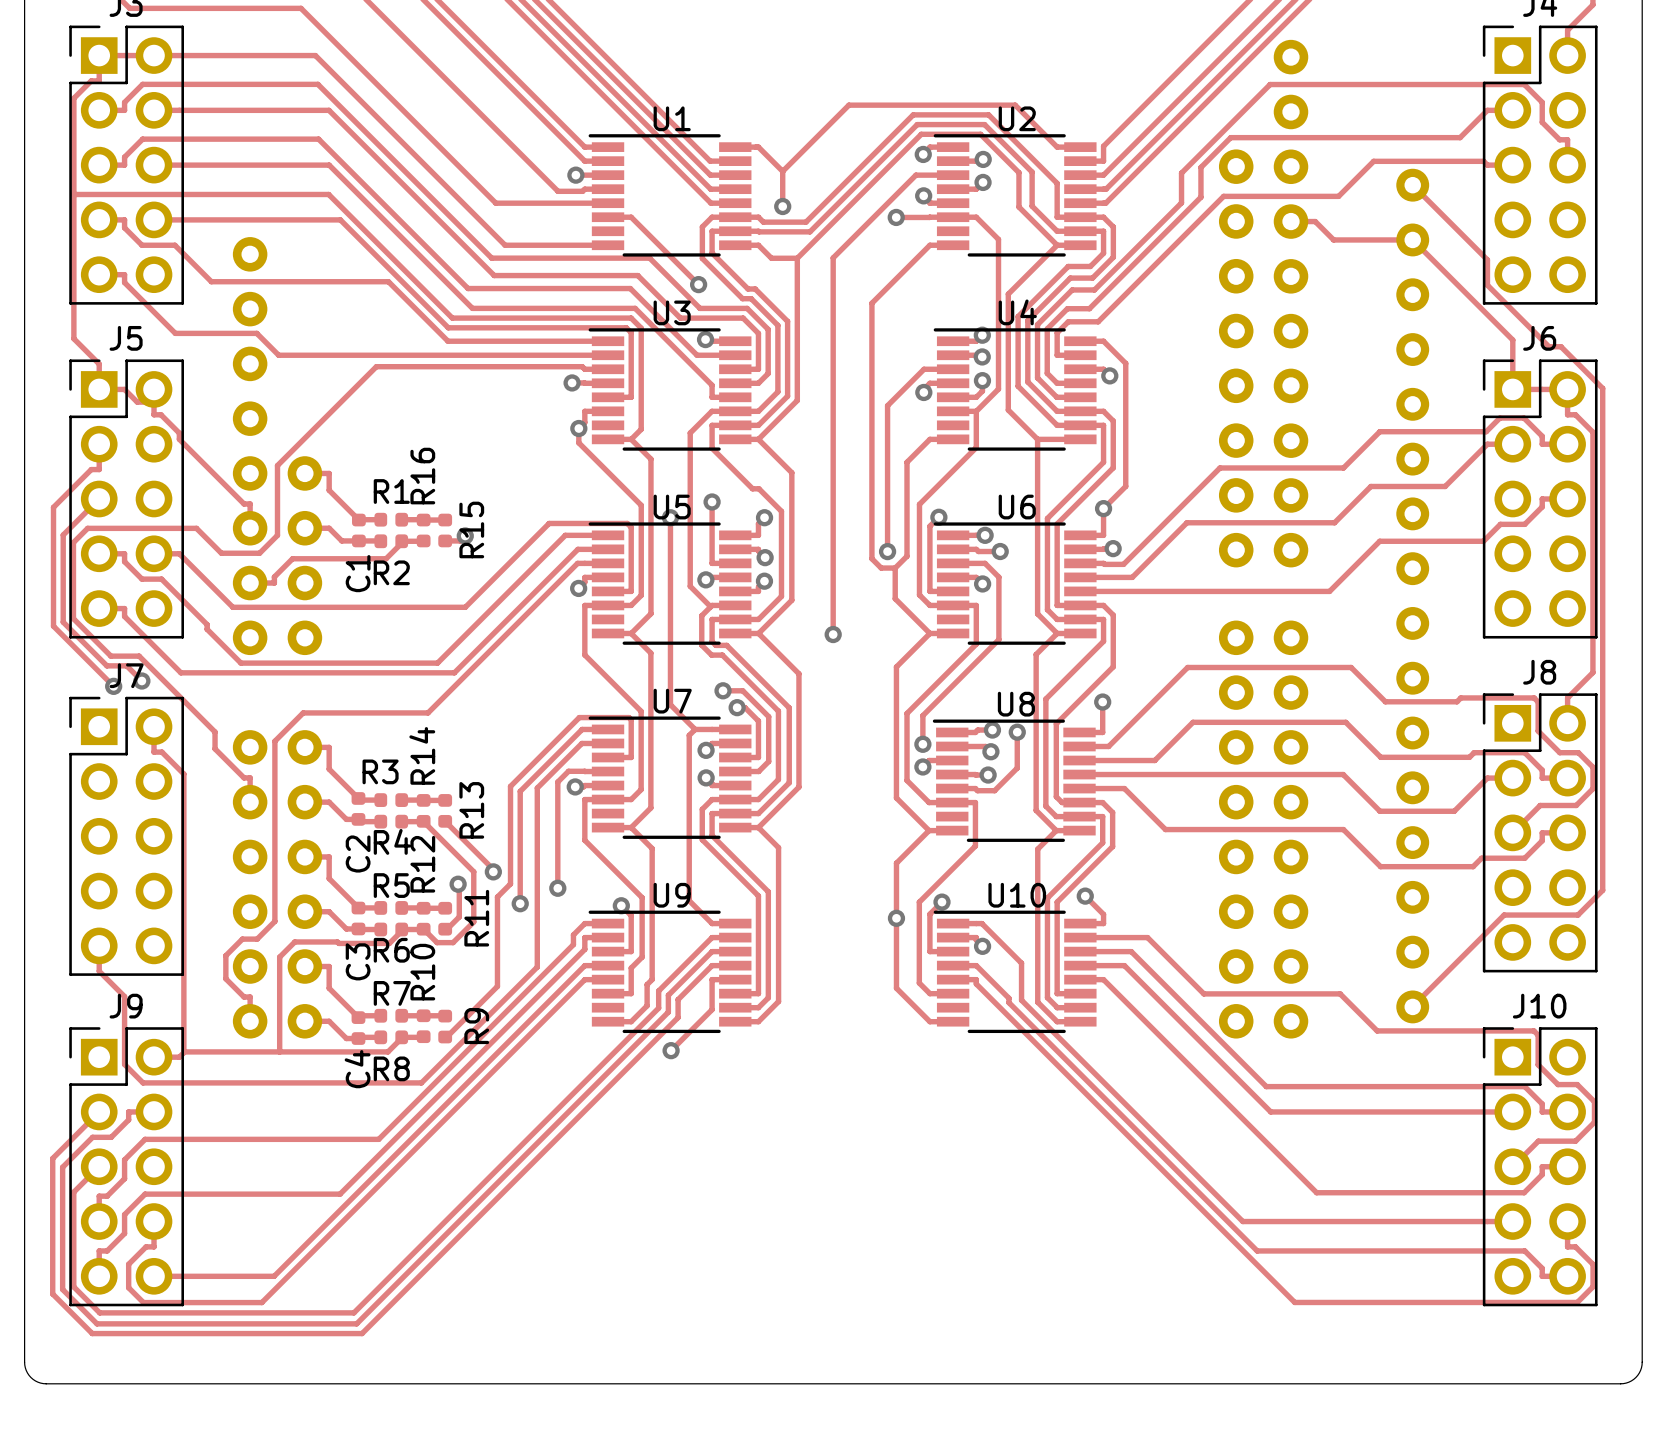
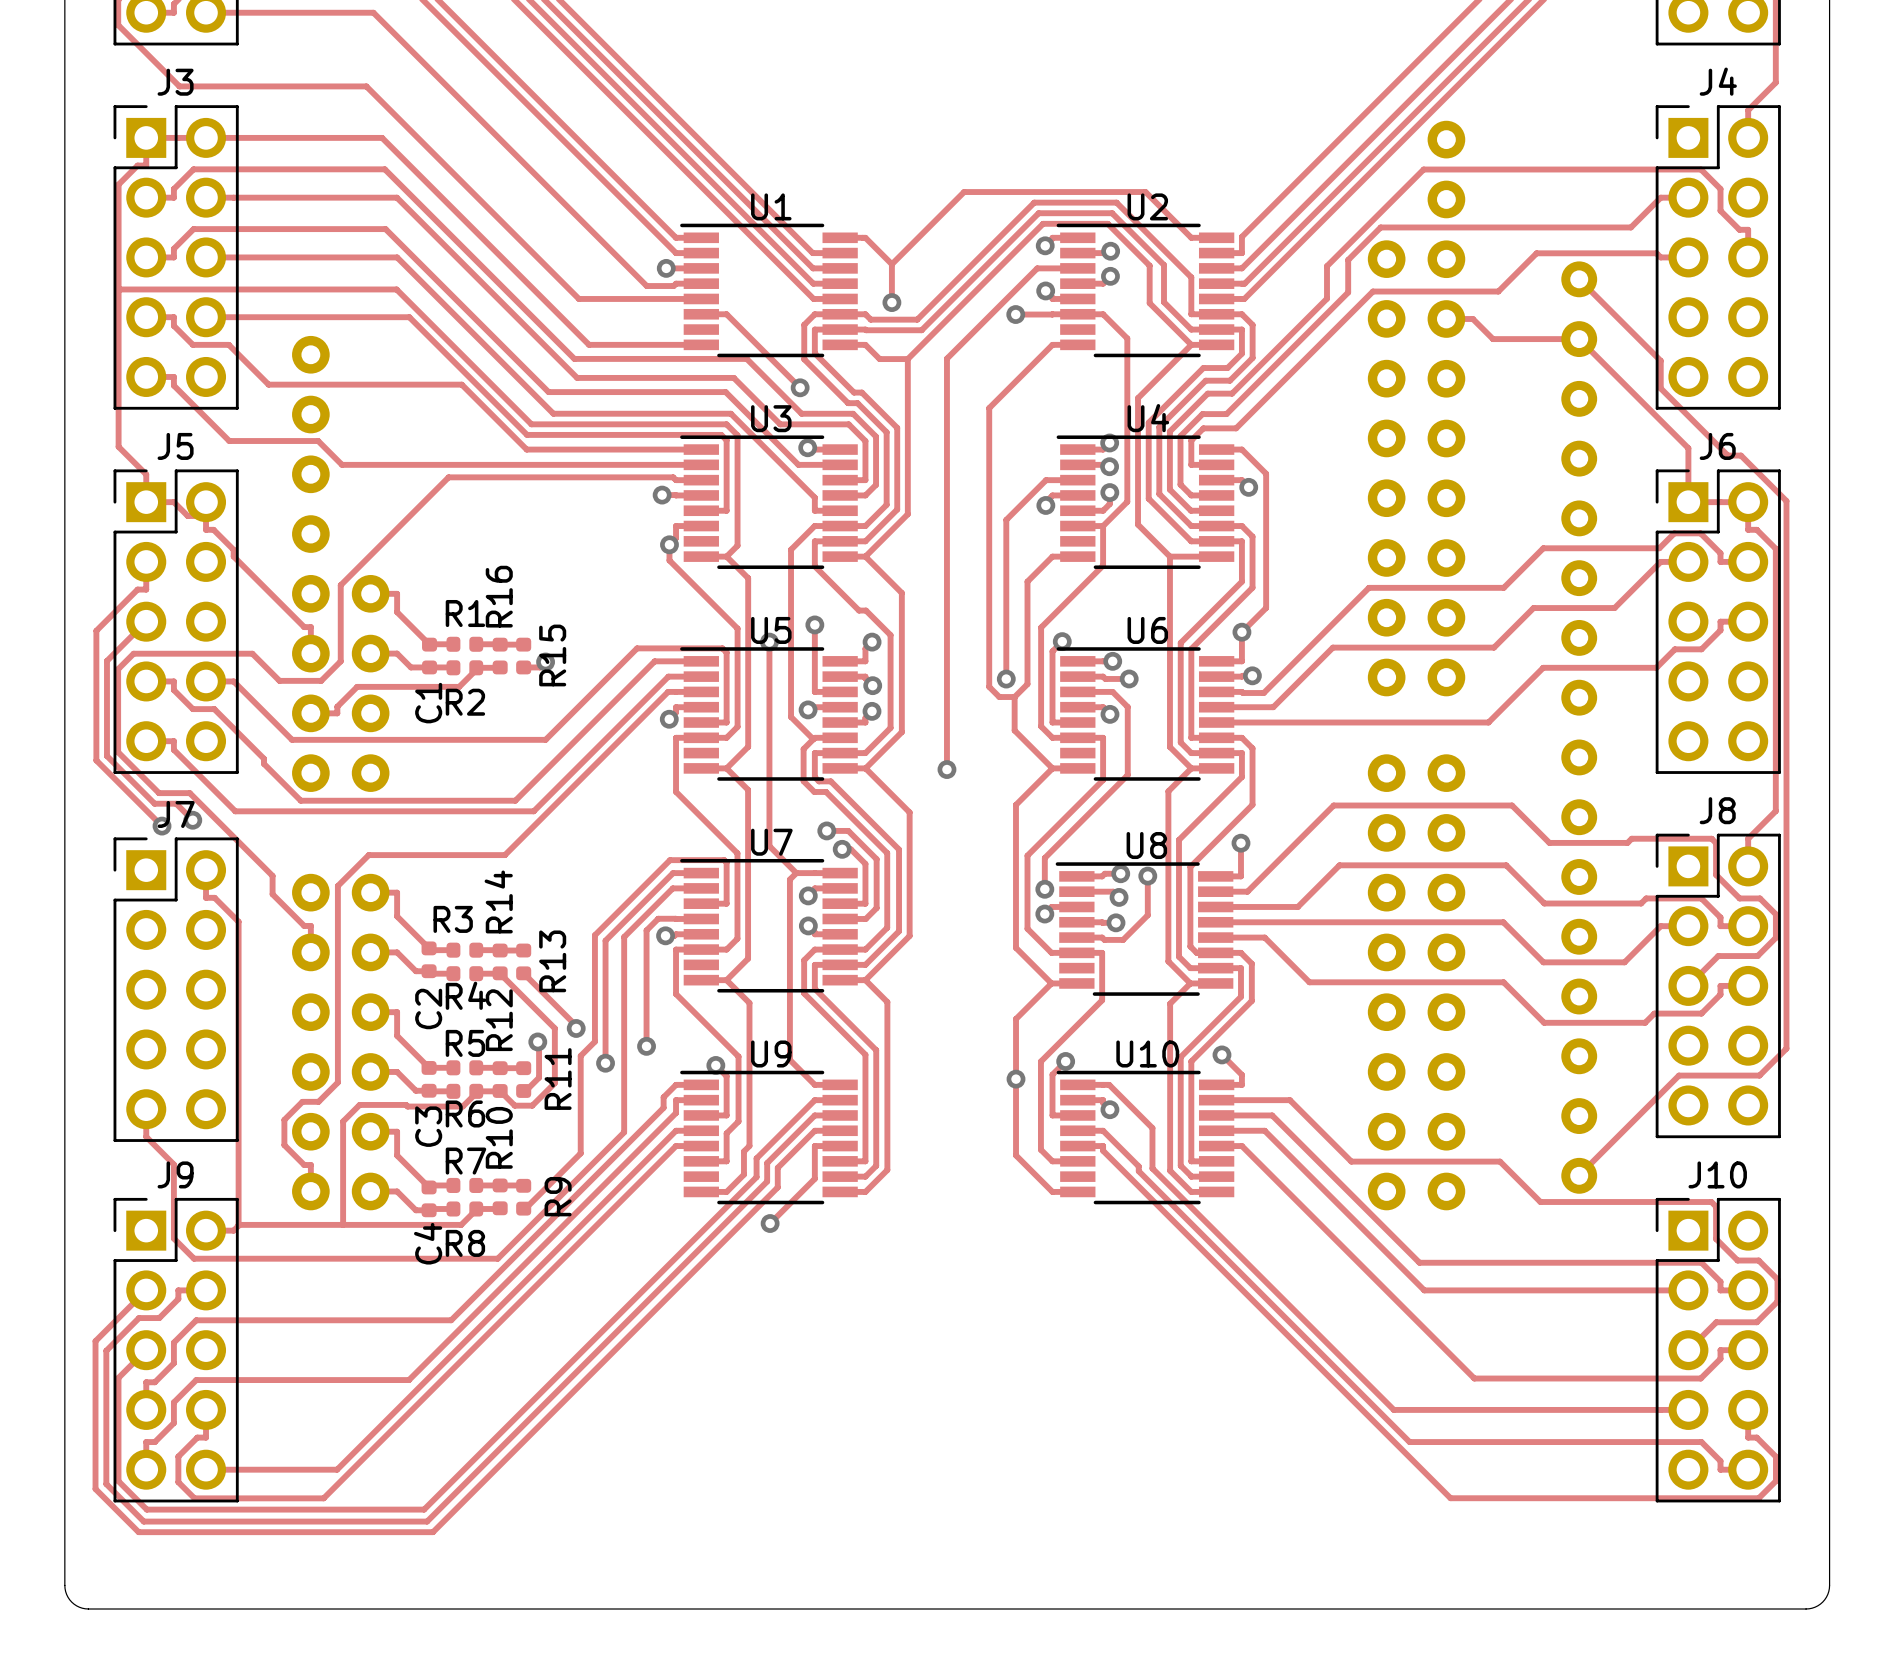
board edge: (24, 1362) (26, 1370) (30, 1377) (37, 1382) (46, 1383) (1620, 1383) (1628, 1382) (1635, 1377) (1640, 1370) (1642, 1362) -> (64, 1563) (65, 1588) (67, 1597) (76, 1605) (88, 1609) (1806, 1609) (1817, 1605) (1826, 1597) (1829, 1588) (1829, 1563)

